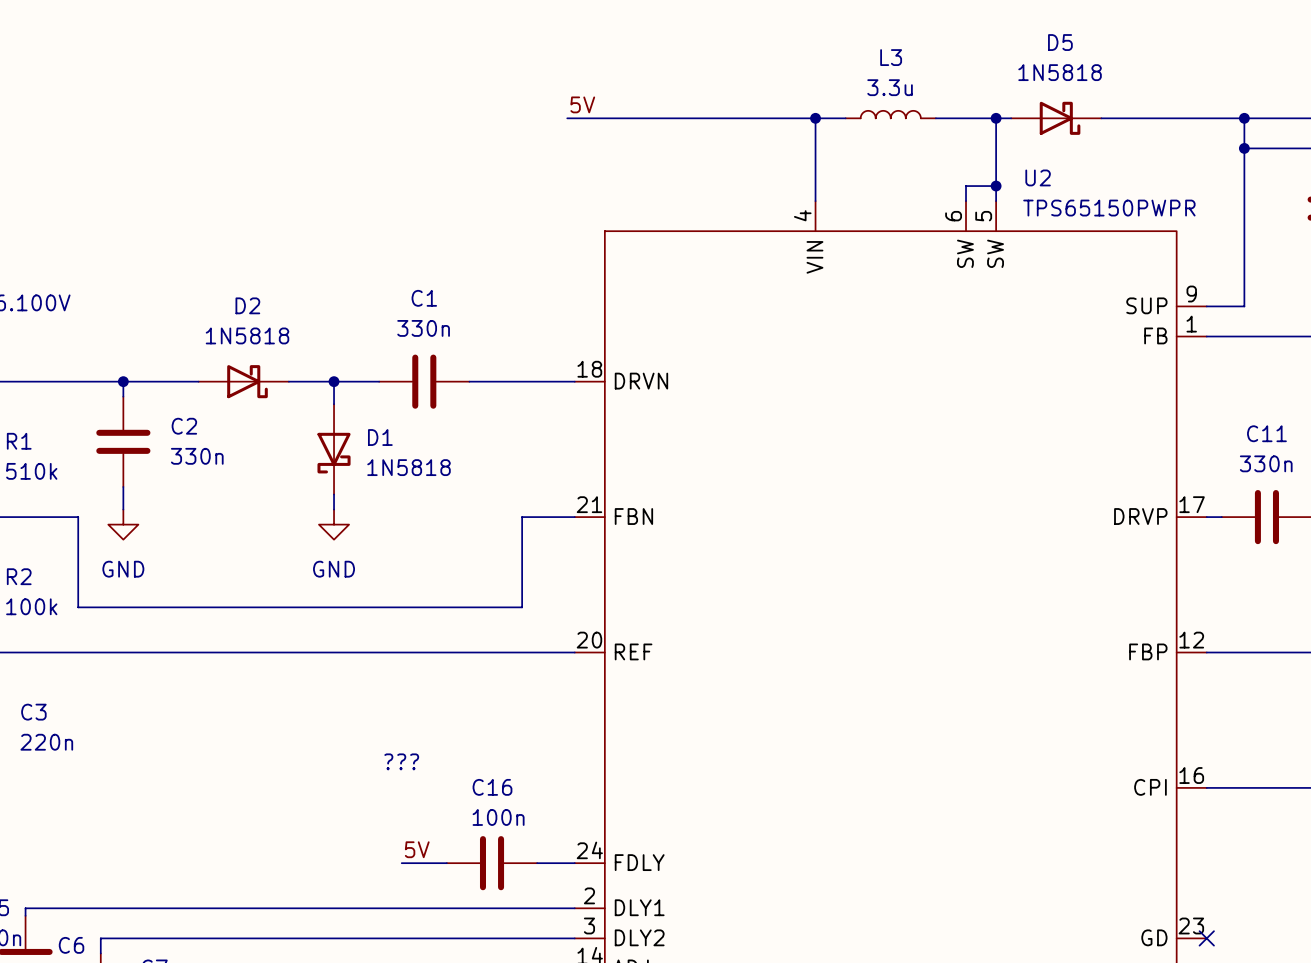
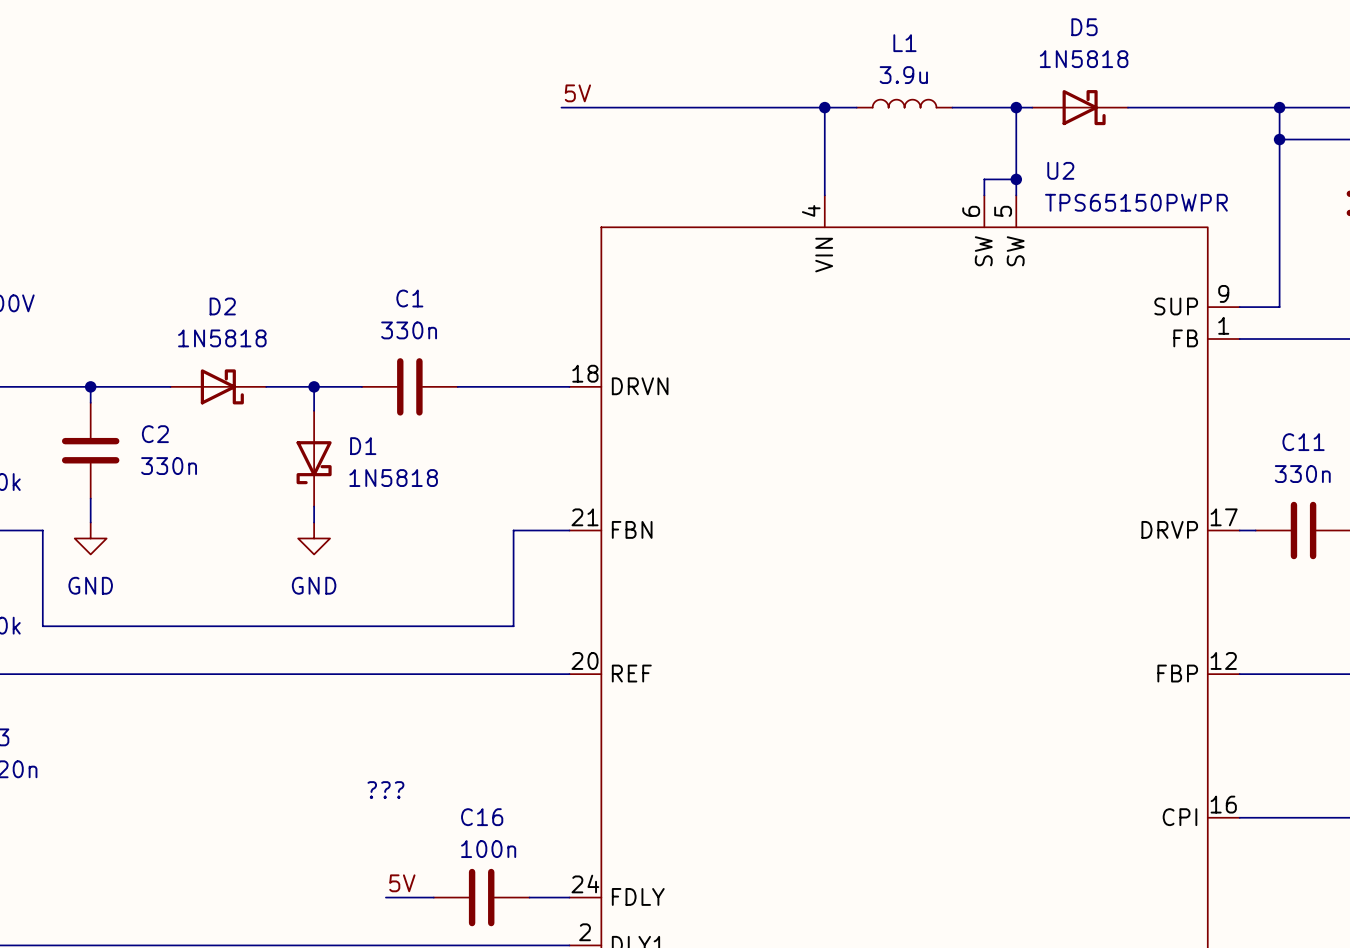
L3 name: L3 (891, 57) -> L1 (904, 43)
L3 value: 3.3u (890, 87) -> 3.9u (903, 75)

